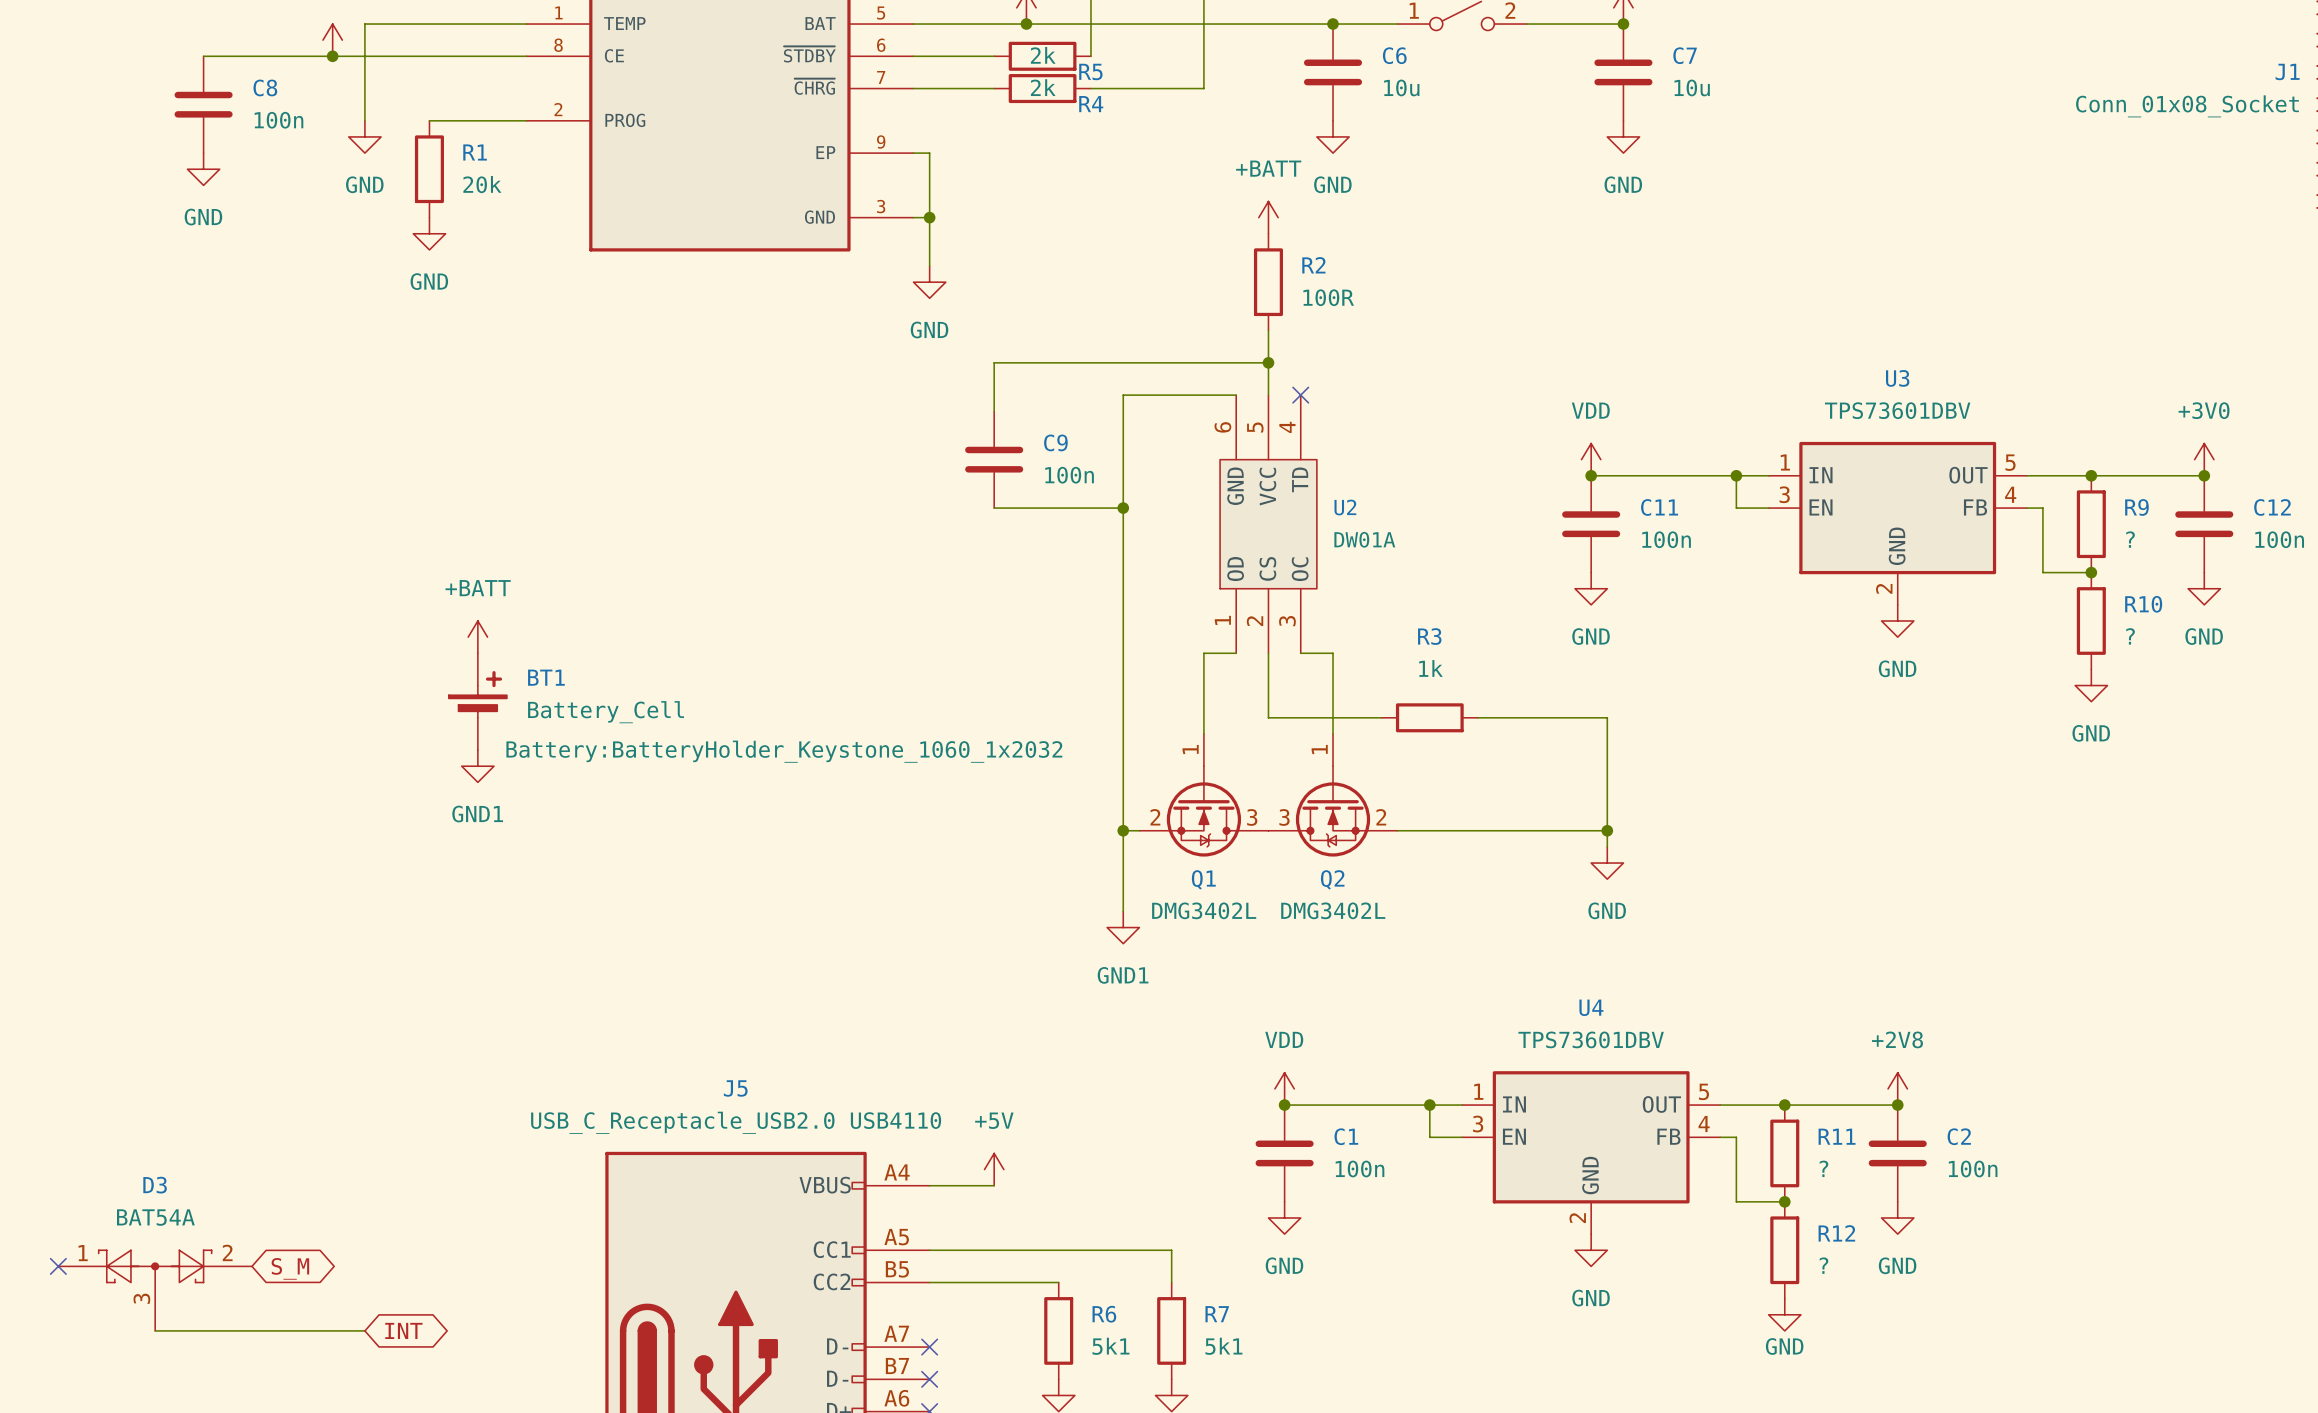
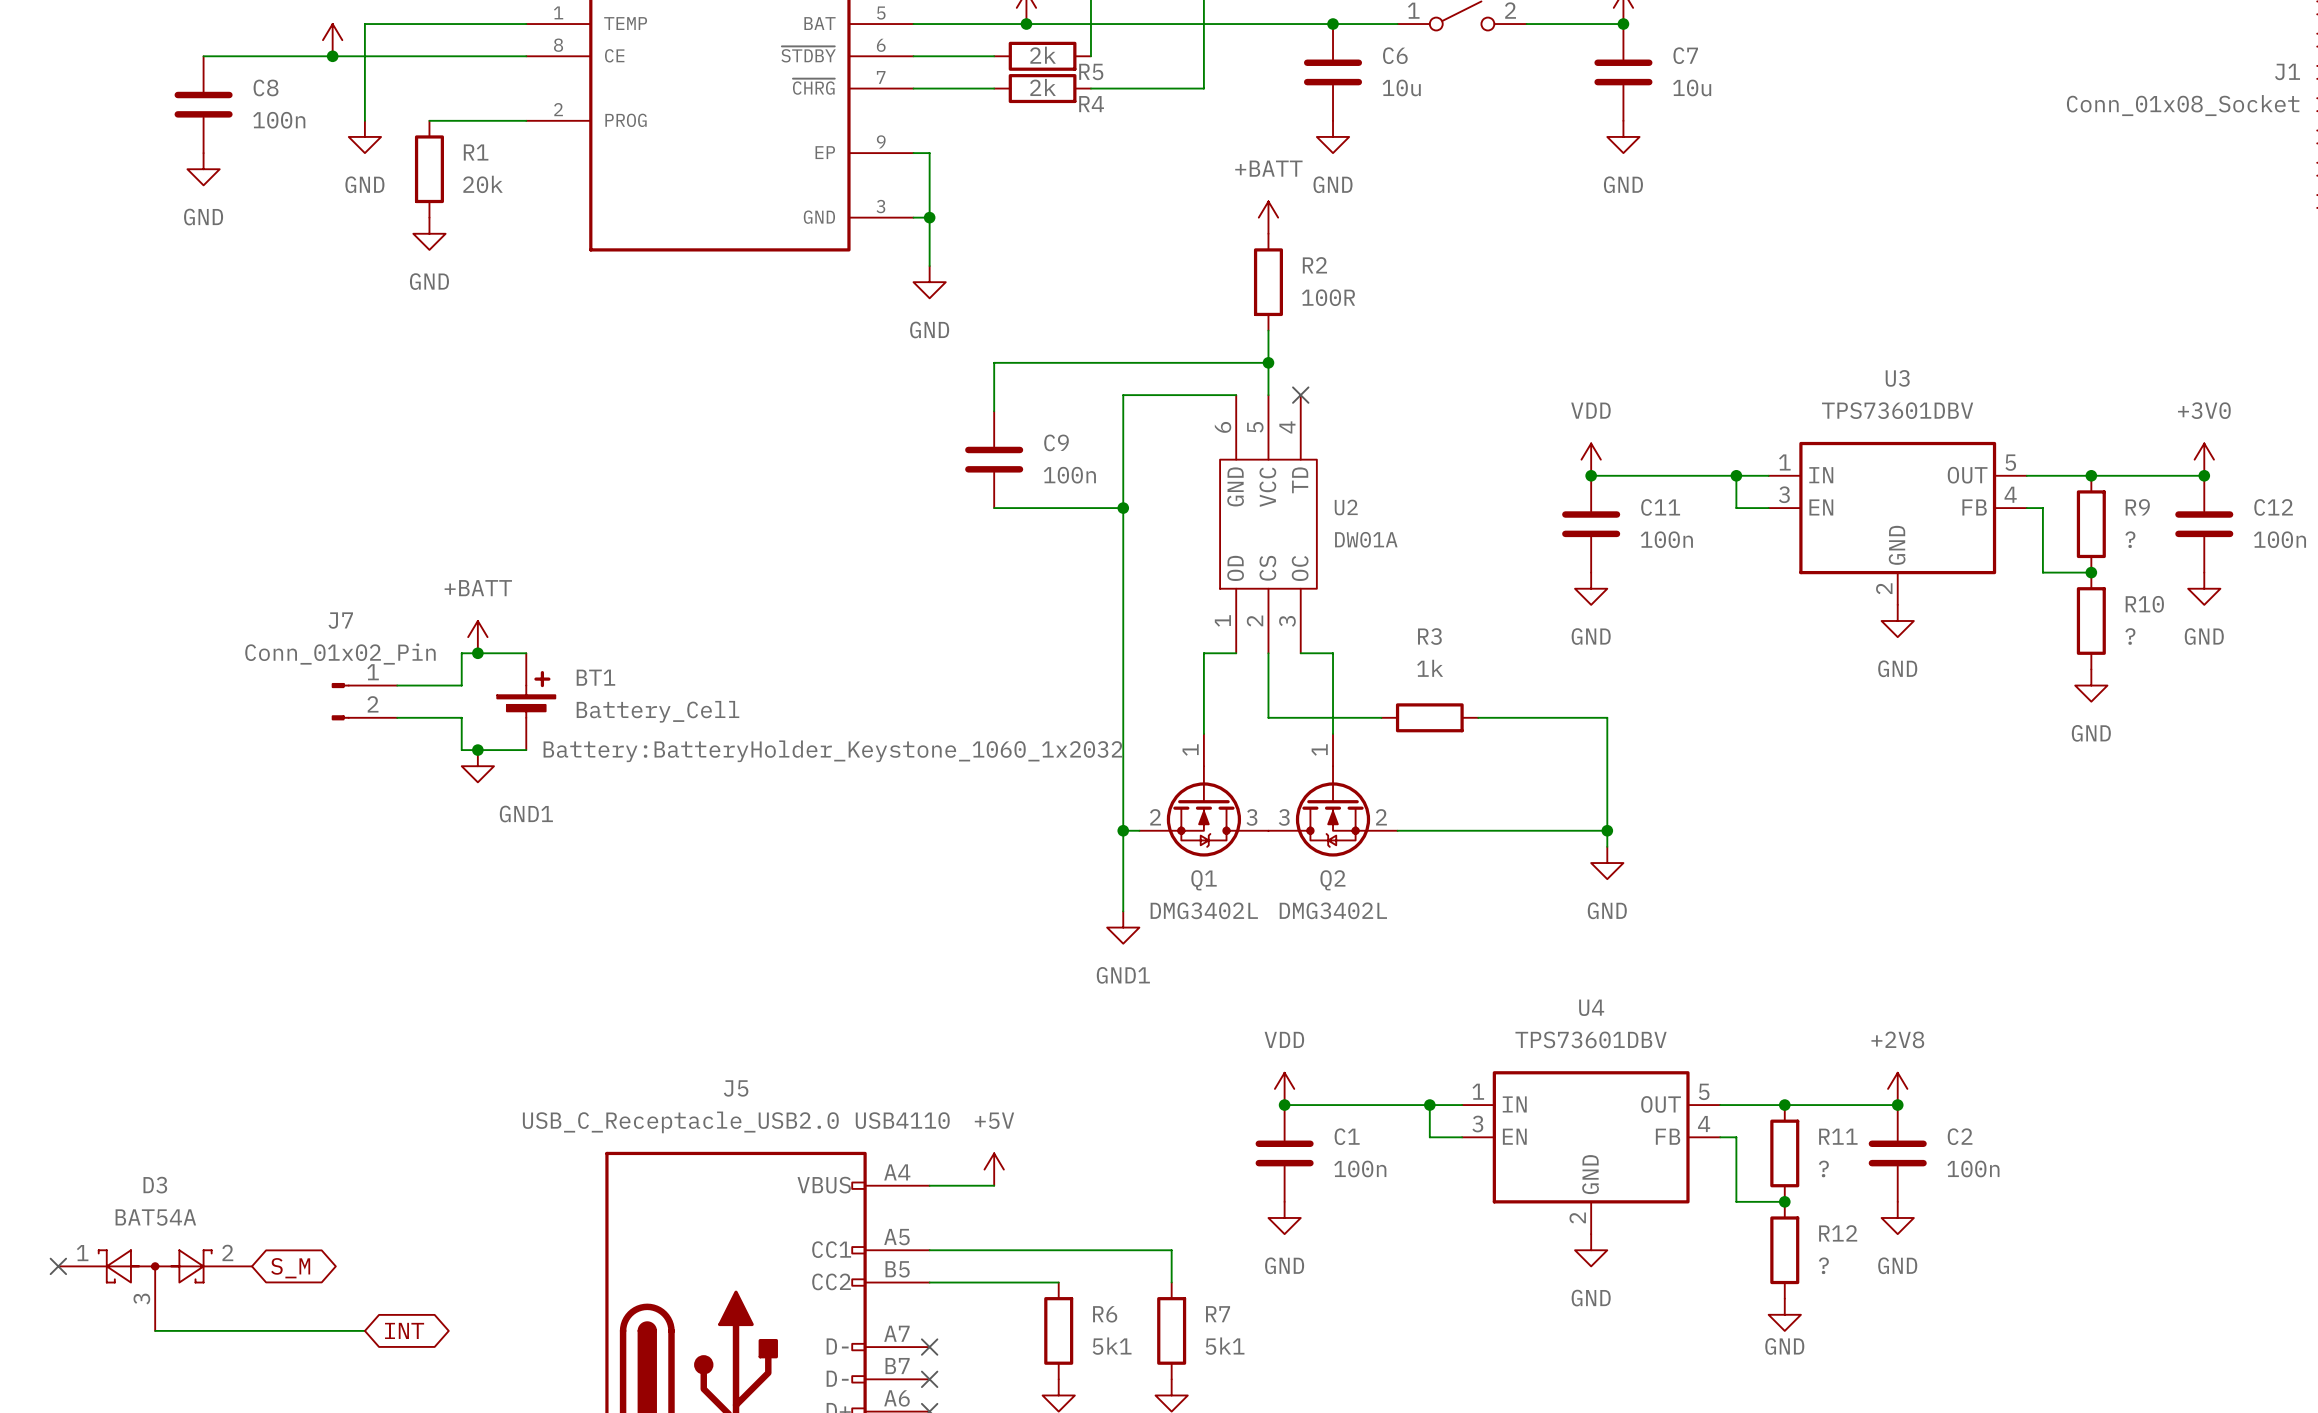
junction: none -> (477, 653)
wire: none -> (526, 653) (461, 653) (461, 685) (397, 685)
J7: none -> Conn_01x02_Pin (364, 701)
BT1 position: (477, 701) -> (526, 701)
wire: none -> (397, 717) (461, 717) (461, 750) (526, 750)
junction: none -> (477, 750)
power symbol text position: GND1 (477, 814) -> GND1 (526, 814)

